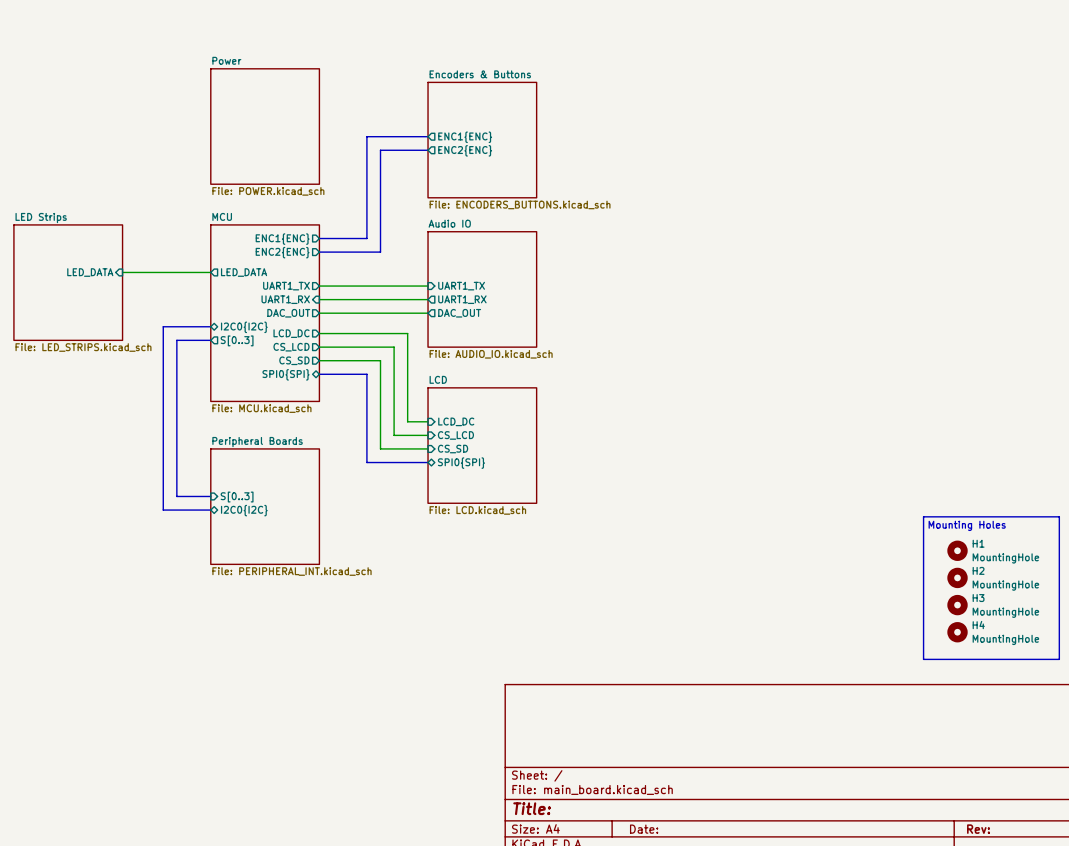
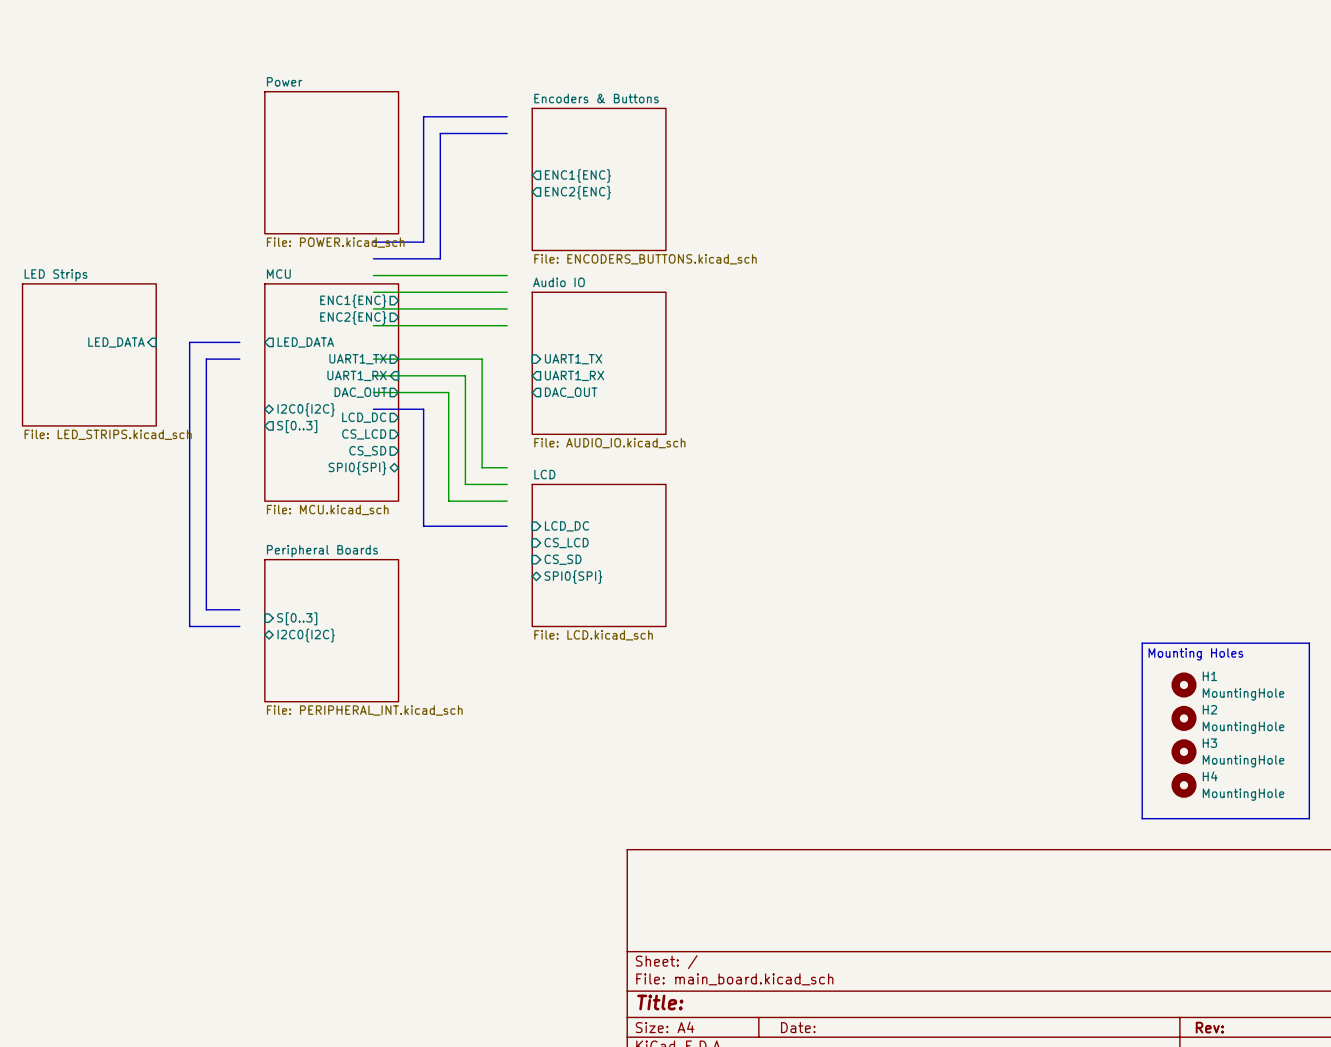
bus: none -> (507, 116) (423, 116) (423, 242) (373, 242)
bus: none -> (507, 133) (440, 133) (440, 258) (373, 258)
bus: (428, 136) (366, 136) (366, 238) (319, 238) -> none
bus: (428, 150) (380, 150) (380, 252) (319, 252) -> none
wire: none -> (373, 275) (507, 275)
wire: none -> (373, 292) (507, 292)
wire: none -> (373, 308) (507, 308)
wire: none -> (373, 325) (507, 325)
wire: (122, 272) (210, 272) -> none
bus: none -> (239, 342) (189, 342) (189, 626) (239, 626)
wire: none -> (373, 359) (398, 359)
wire: (387, 286) (428, 286) -> (482, 359) (482, 467) (507, 467)
wire: none -> (373, 375) (398, 375)
wire: (373, 299) (428, 299) -> (465, 375) (465, 484) (507, 484)
wire: none -> (373, 392) (398, 392)
wire: (360, 313) (428, 313) -> (448, 392) (448, 501) (507, 501)
bus: (163, 326) (210, 326) -> (206, 409) (206, 359) (239, 359)
bus: none -> (373, 409) (423, 409) (423, 526) (507, 526)
wire: (319, 333) (407, 333) (407, 421) (428, 421) -> none
bus: (210, 340) (176, 340) (176, 496) (210, 496) -> none
wire: (319, 347) (394, 347) (394, 435) (428, 435) -> none
wire: (319, 360) (380, 360) (380, 448) (428, 448) -> none
bus: (319, 374) (366, 374) (366, 462) (428, 462) -> none
bus: (163, 489) (163, 510) (210, 510) -> (206, 609) (239, 609)

